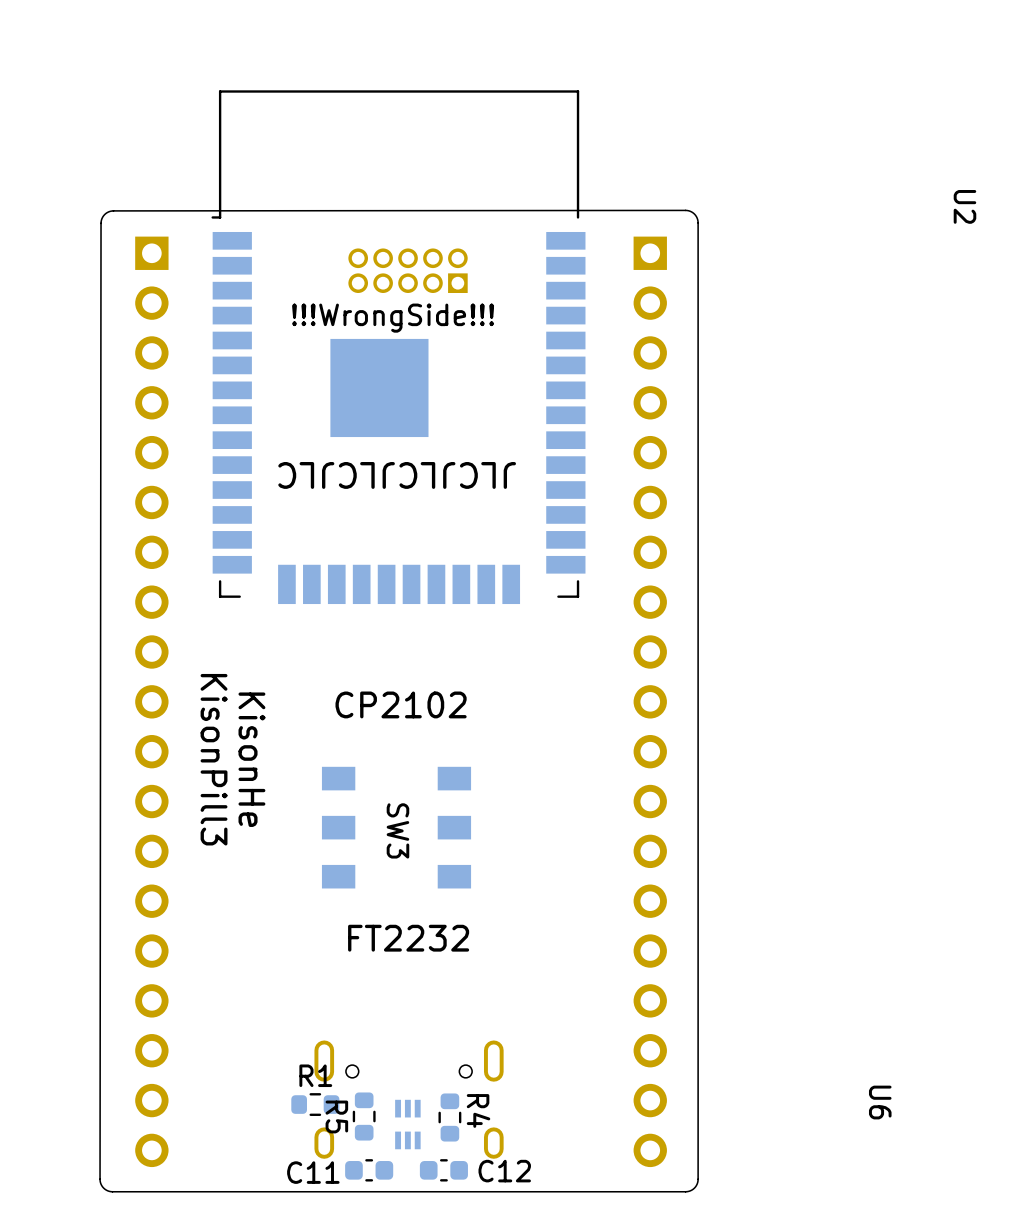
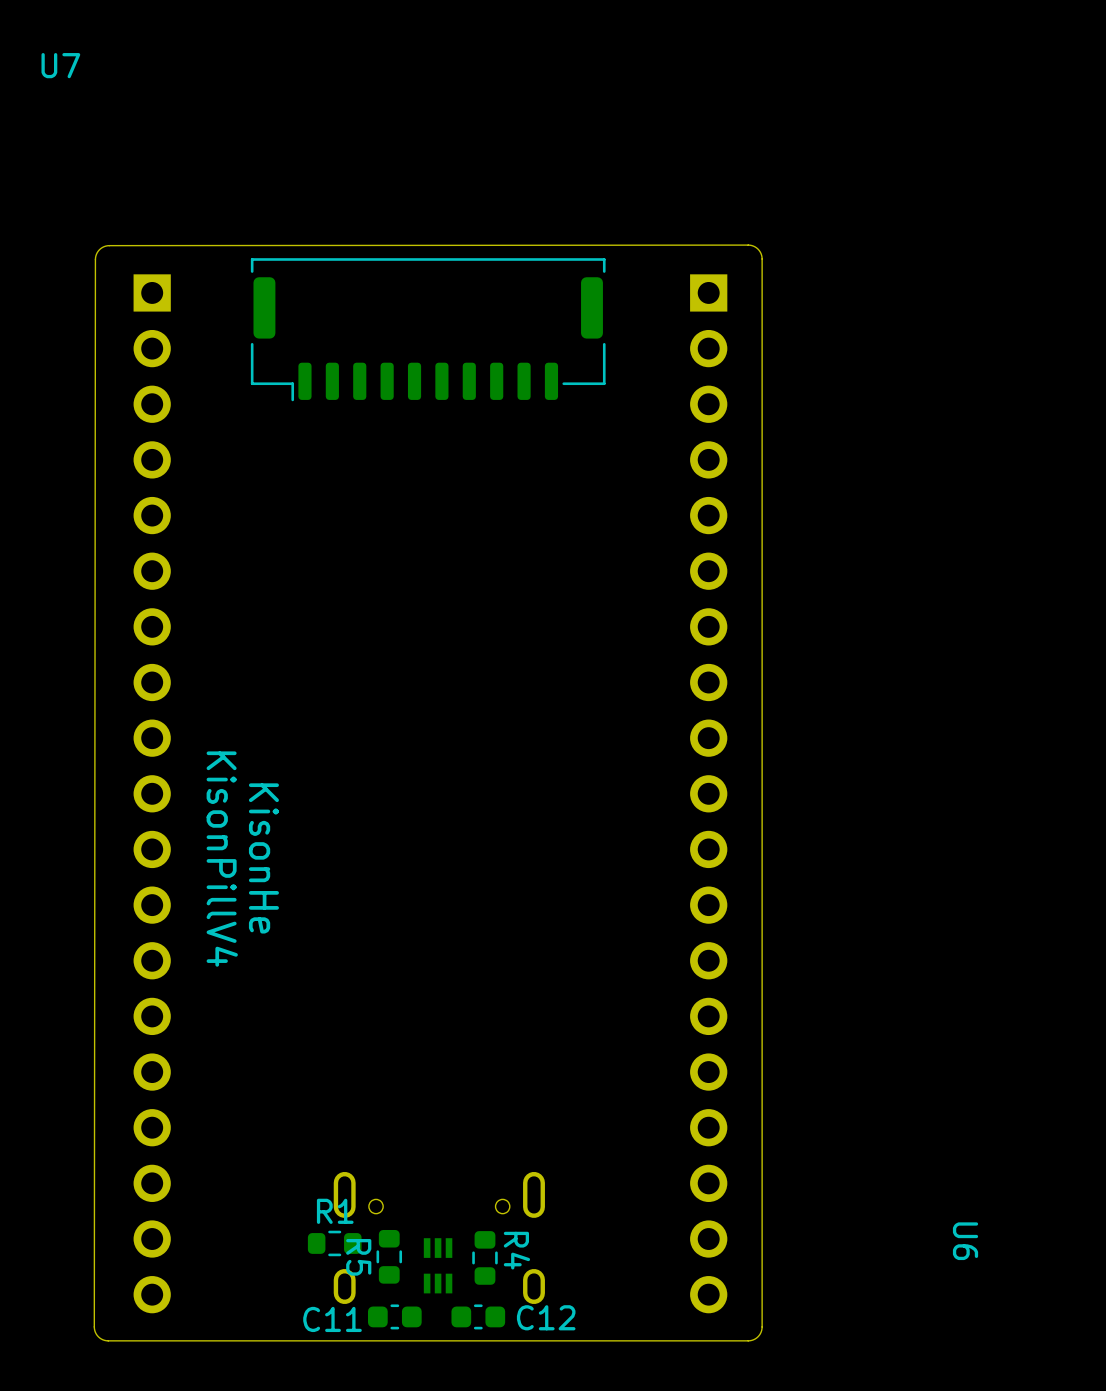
part: (408, 270) -> none
U7: none -> (428, 329)
U2: (398, 347) -> none
text: JLCJLCJLCJLC (397, 475) -> none
text: CP2102 (401, 704) -> none
text: KisonPill3 (214, 759) -> KisonPillV4 (222, 859)
SW3: (396, 827) -> none
text: FT2232 (408, 938) -> none

